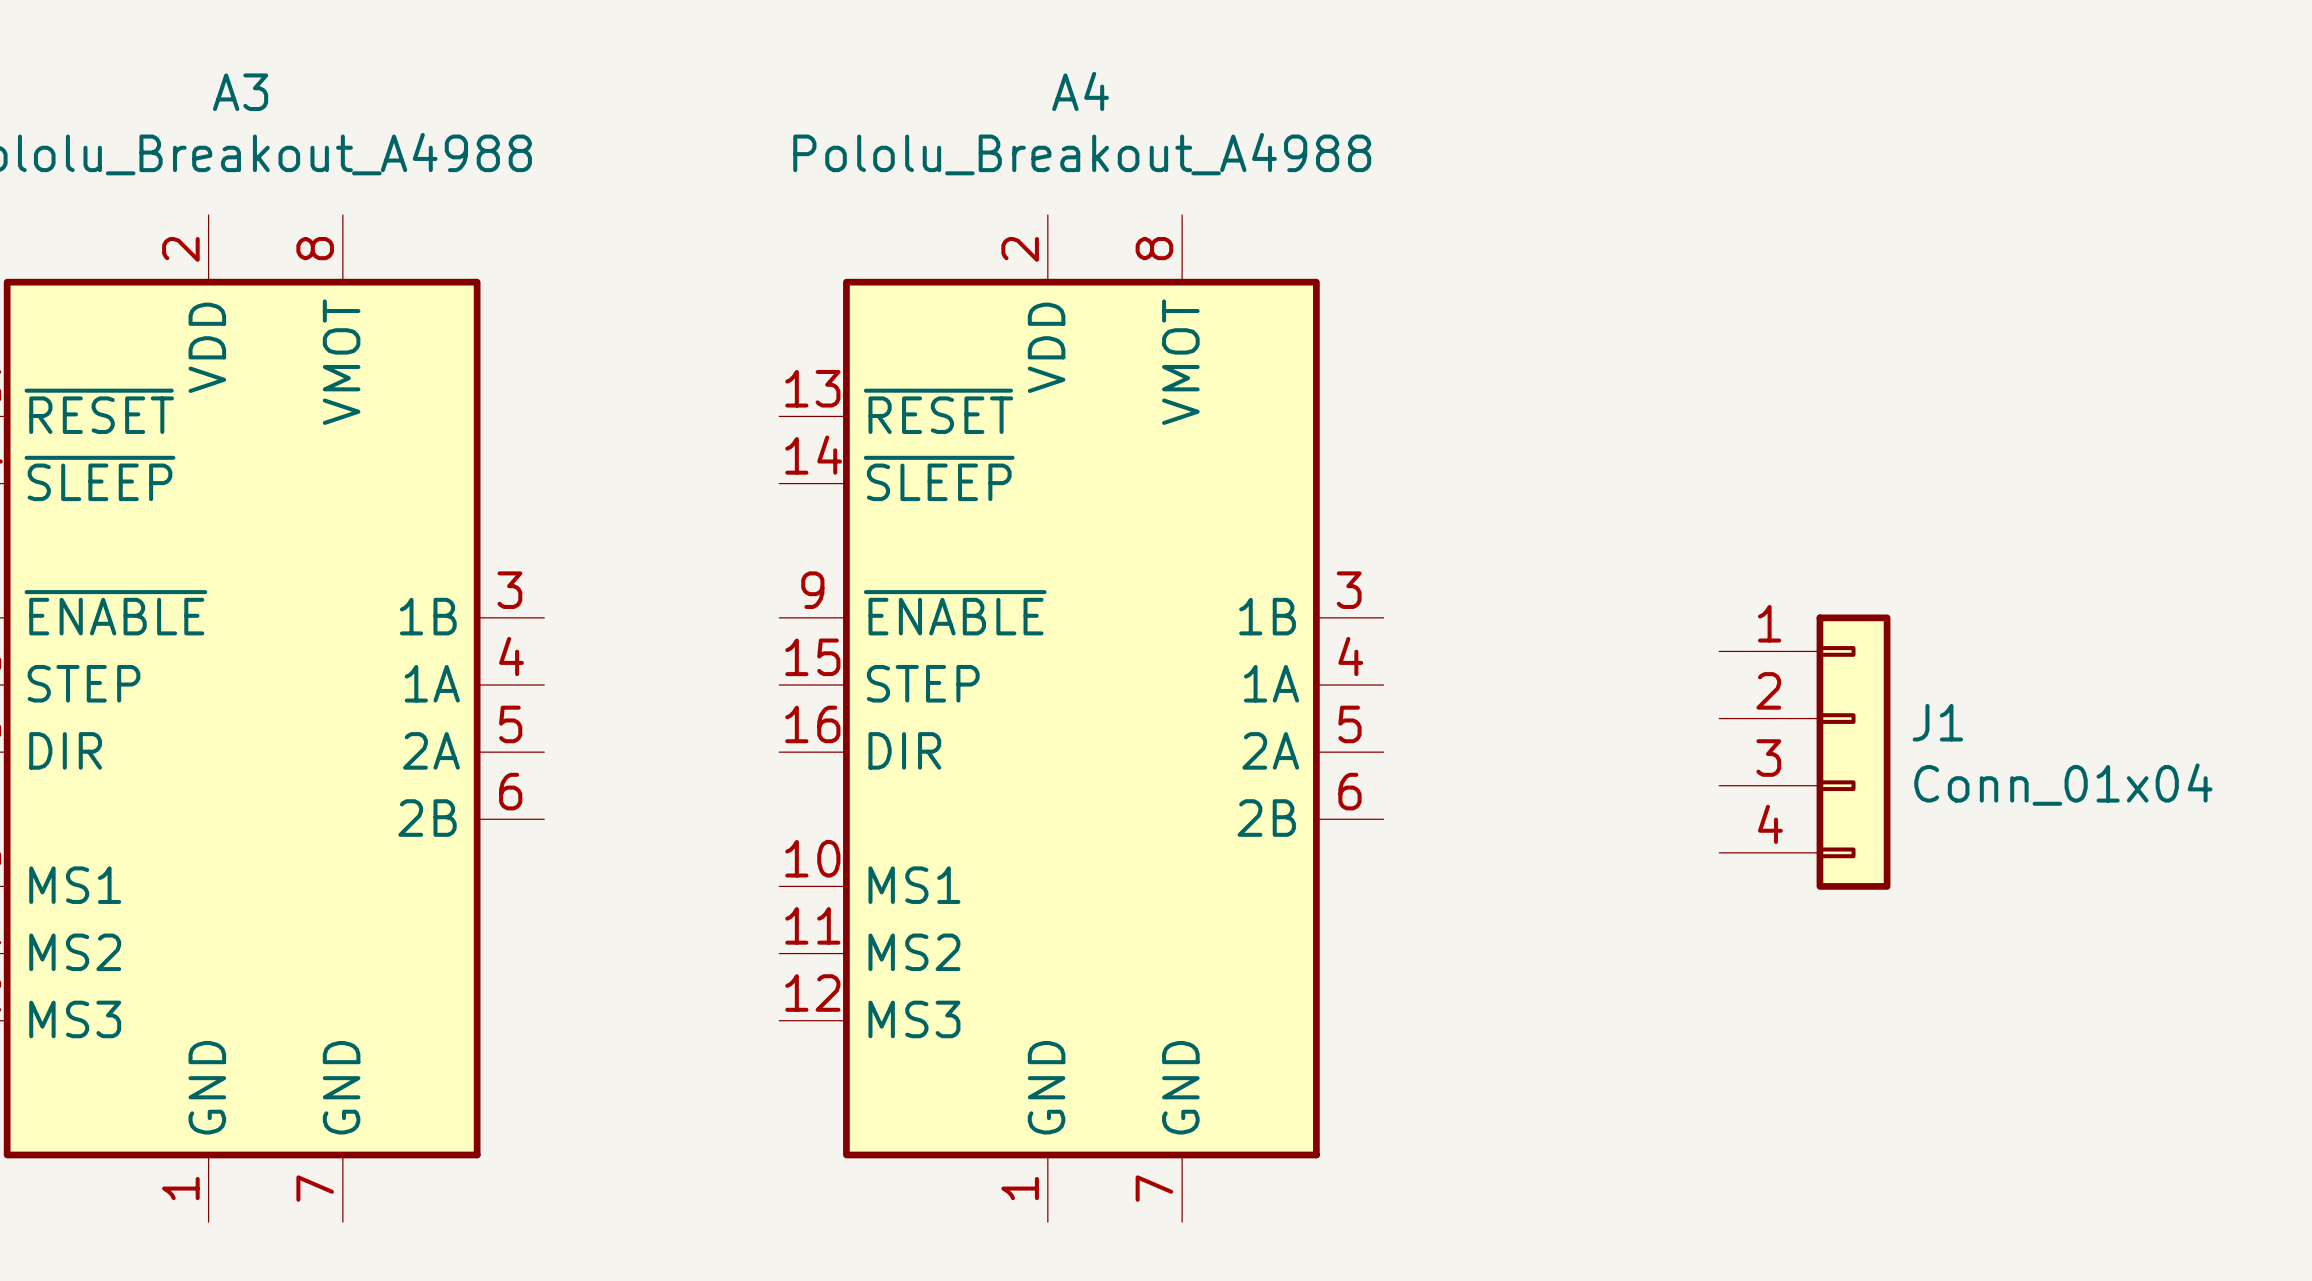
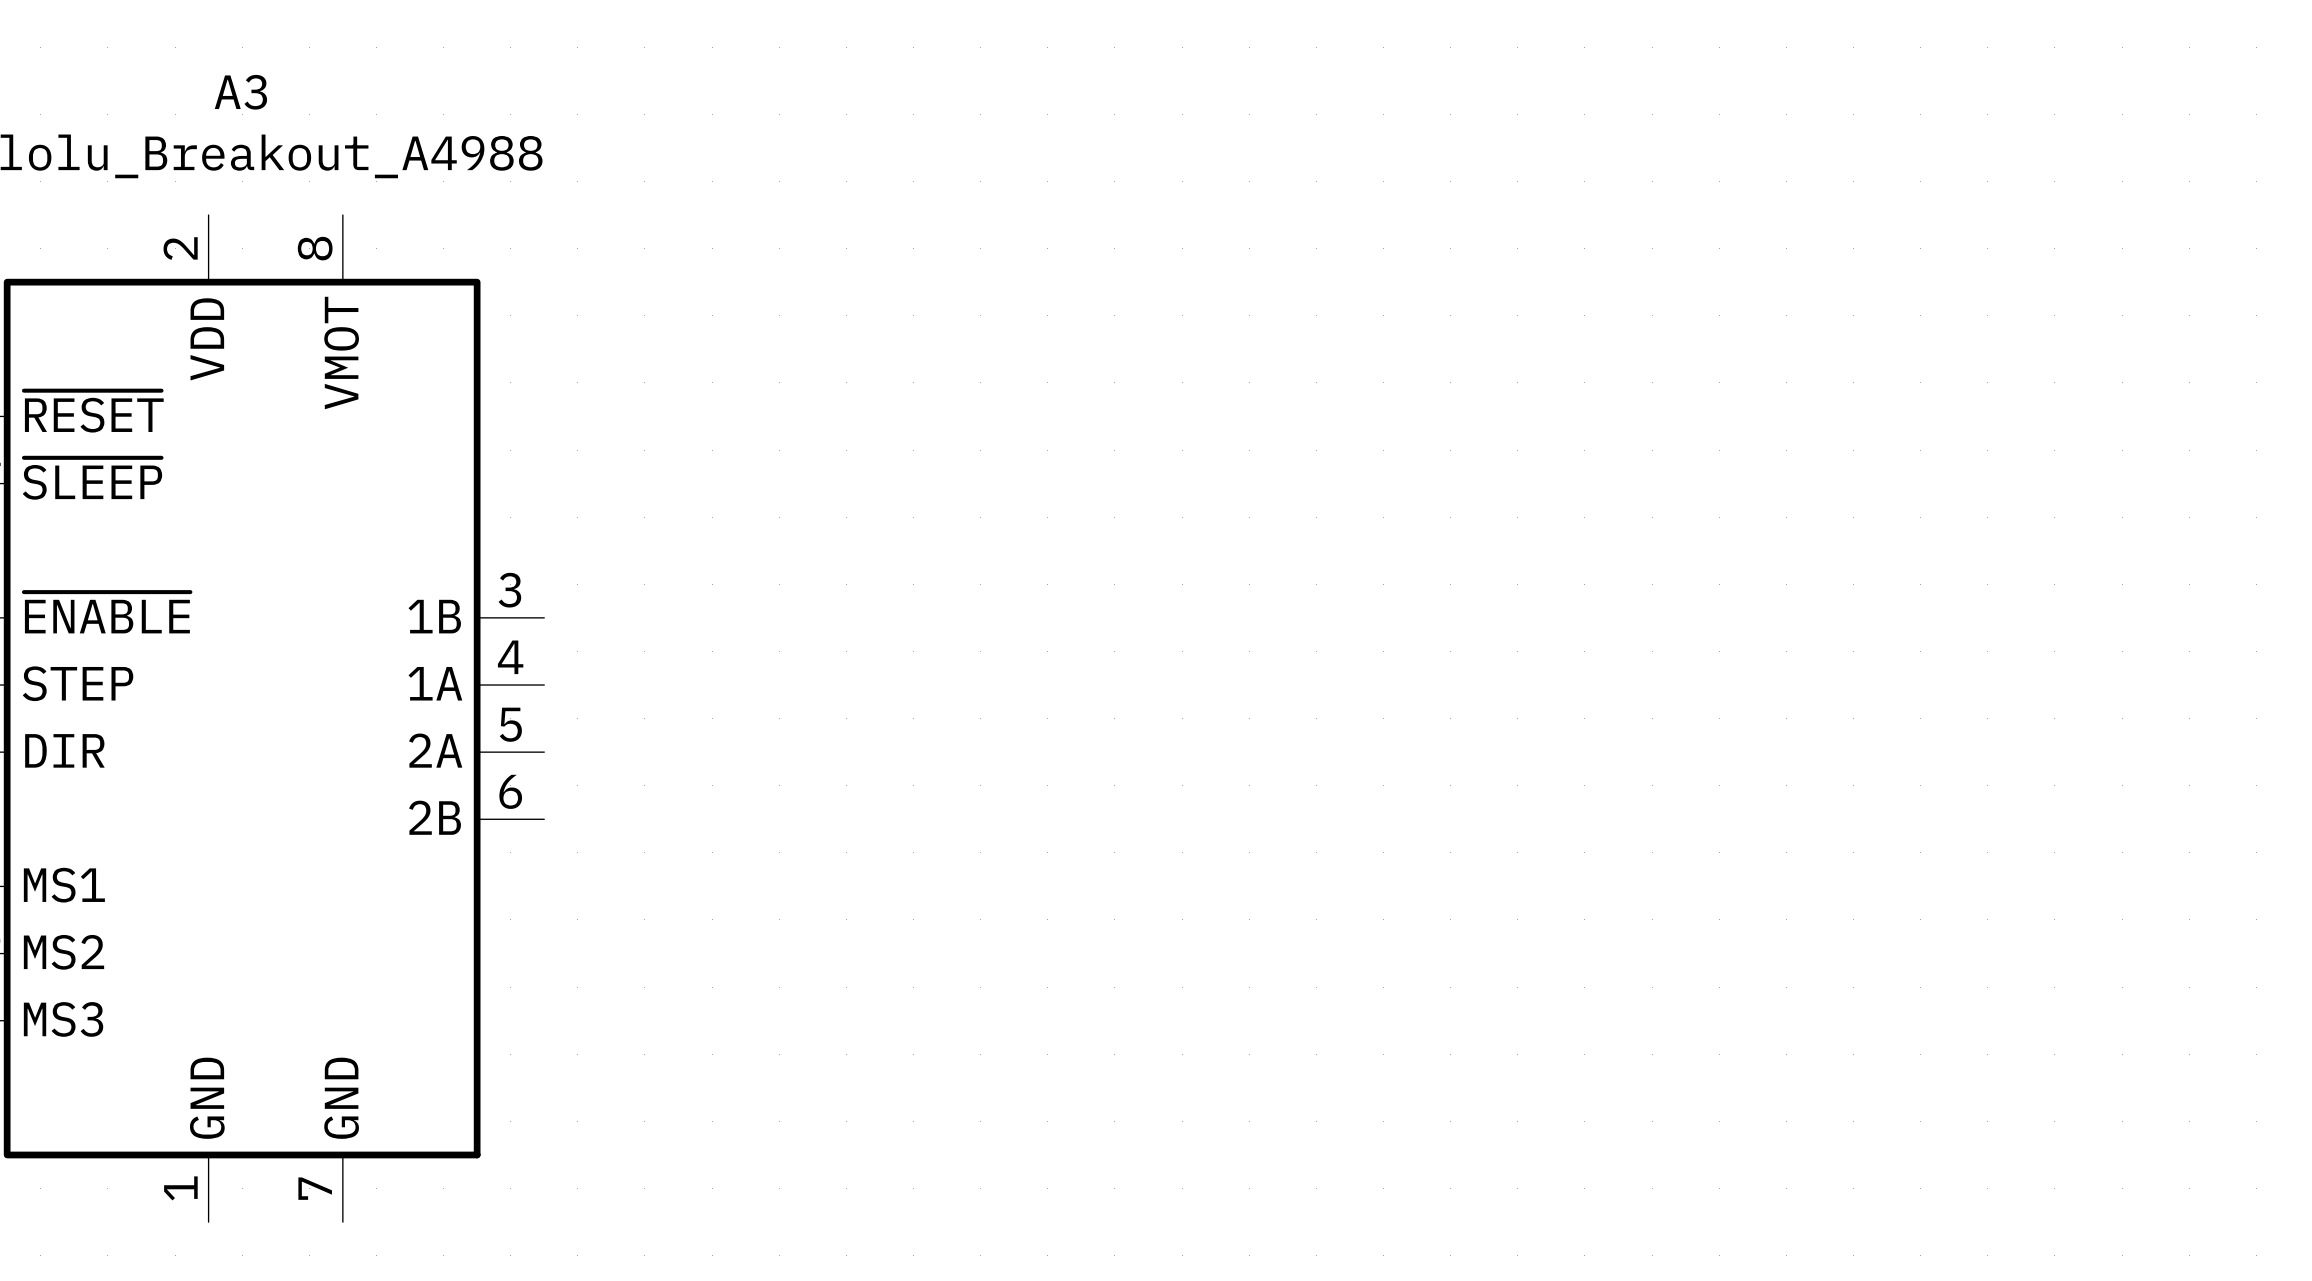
A4: Pololu_Breakout_A4988 (1081, 718) -> none
J1: Conn_01x04 (1804, 752) -> none

